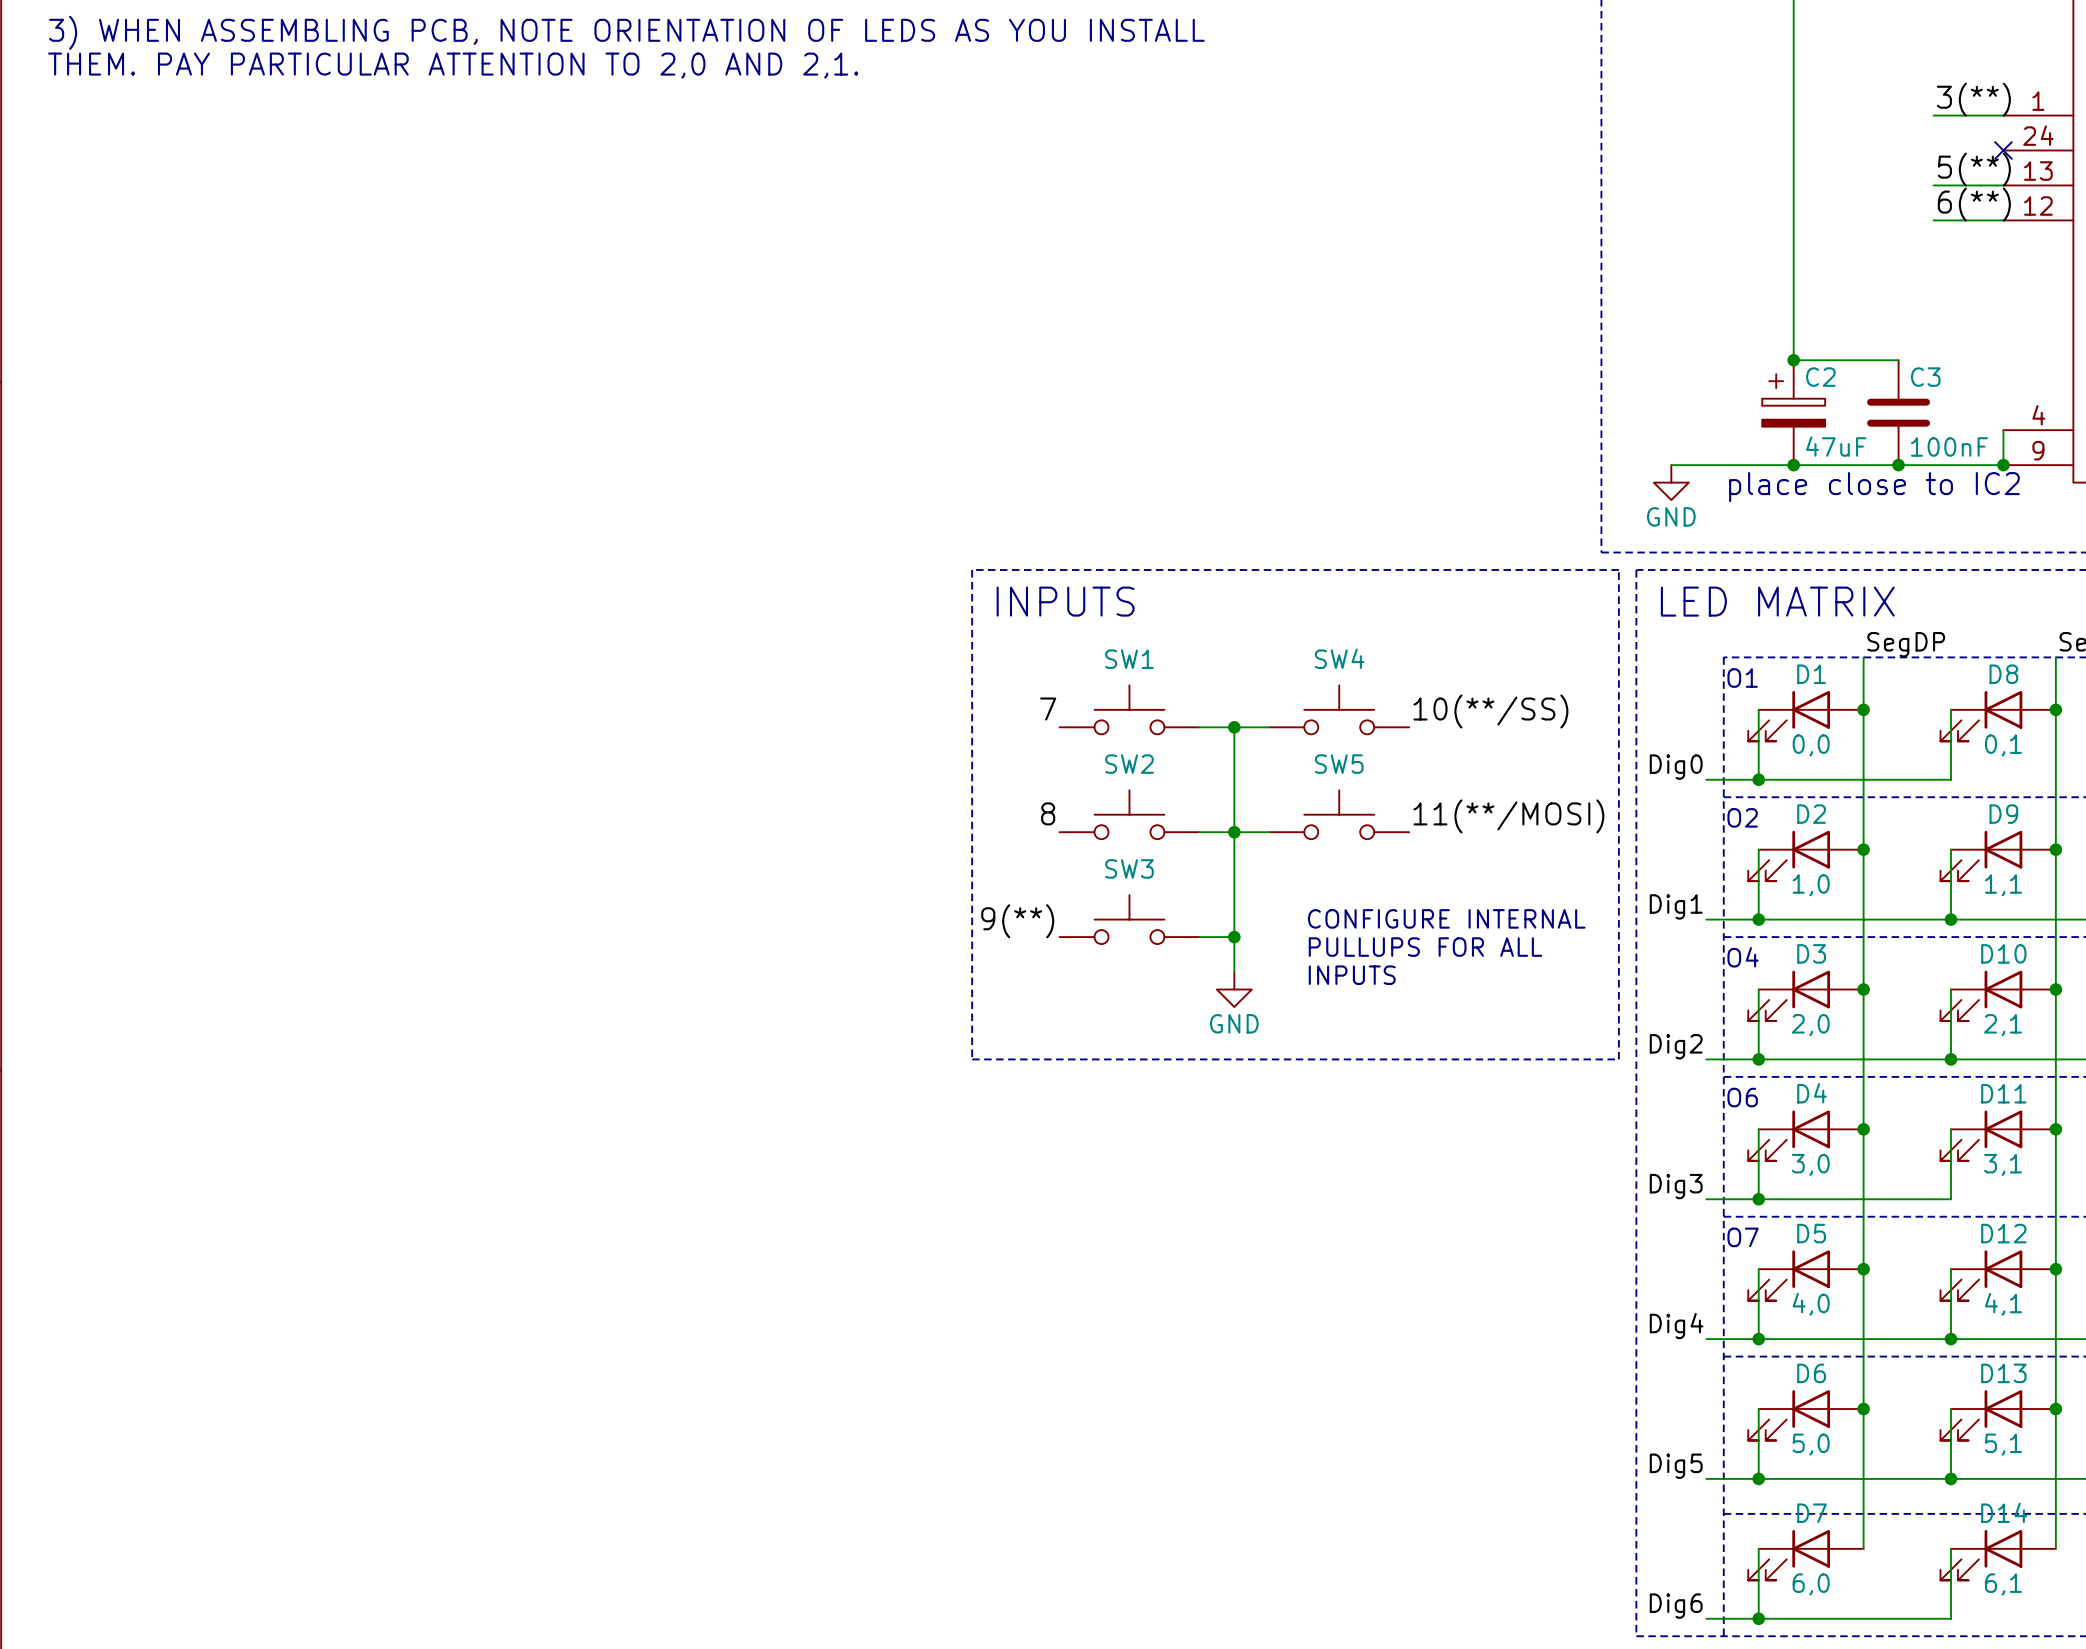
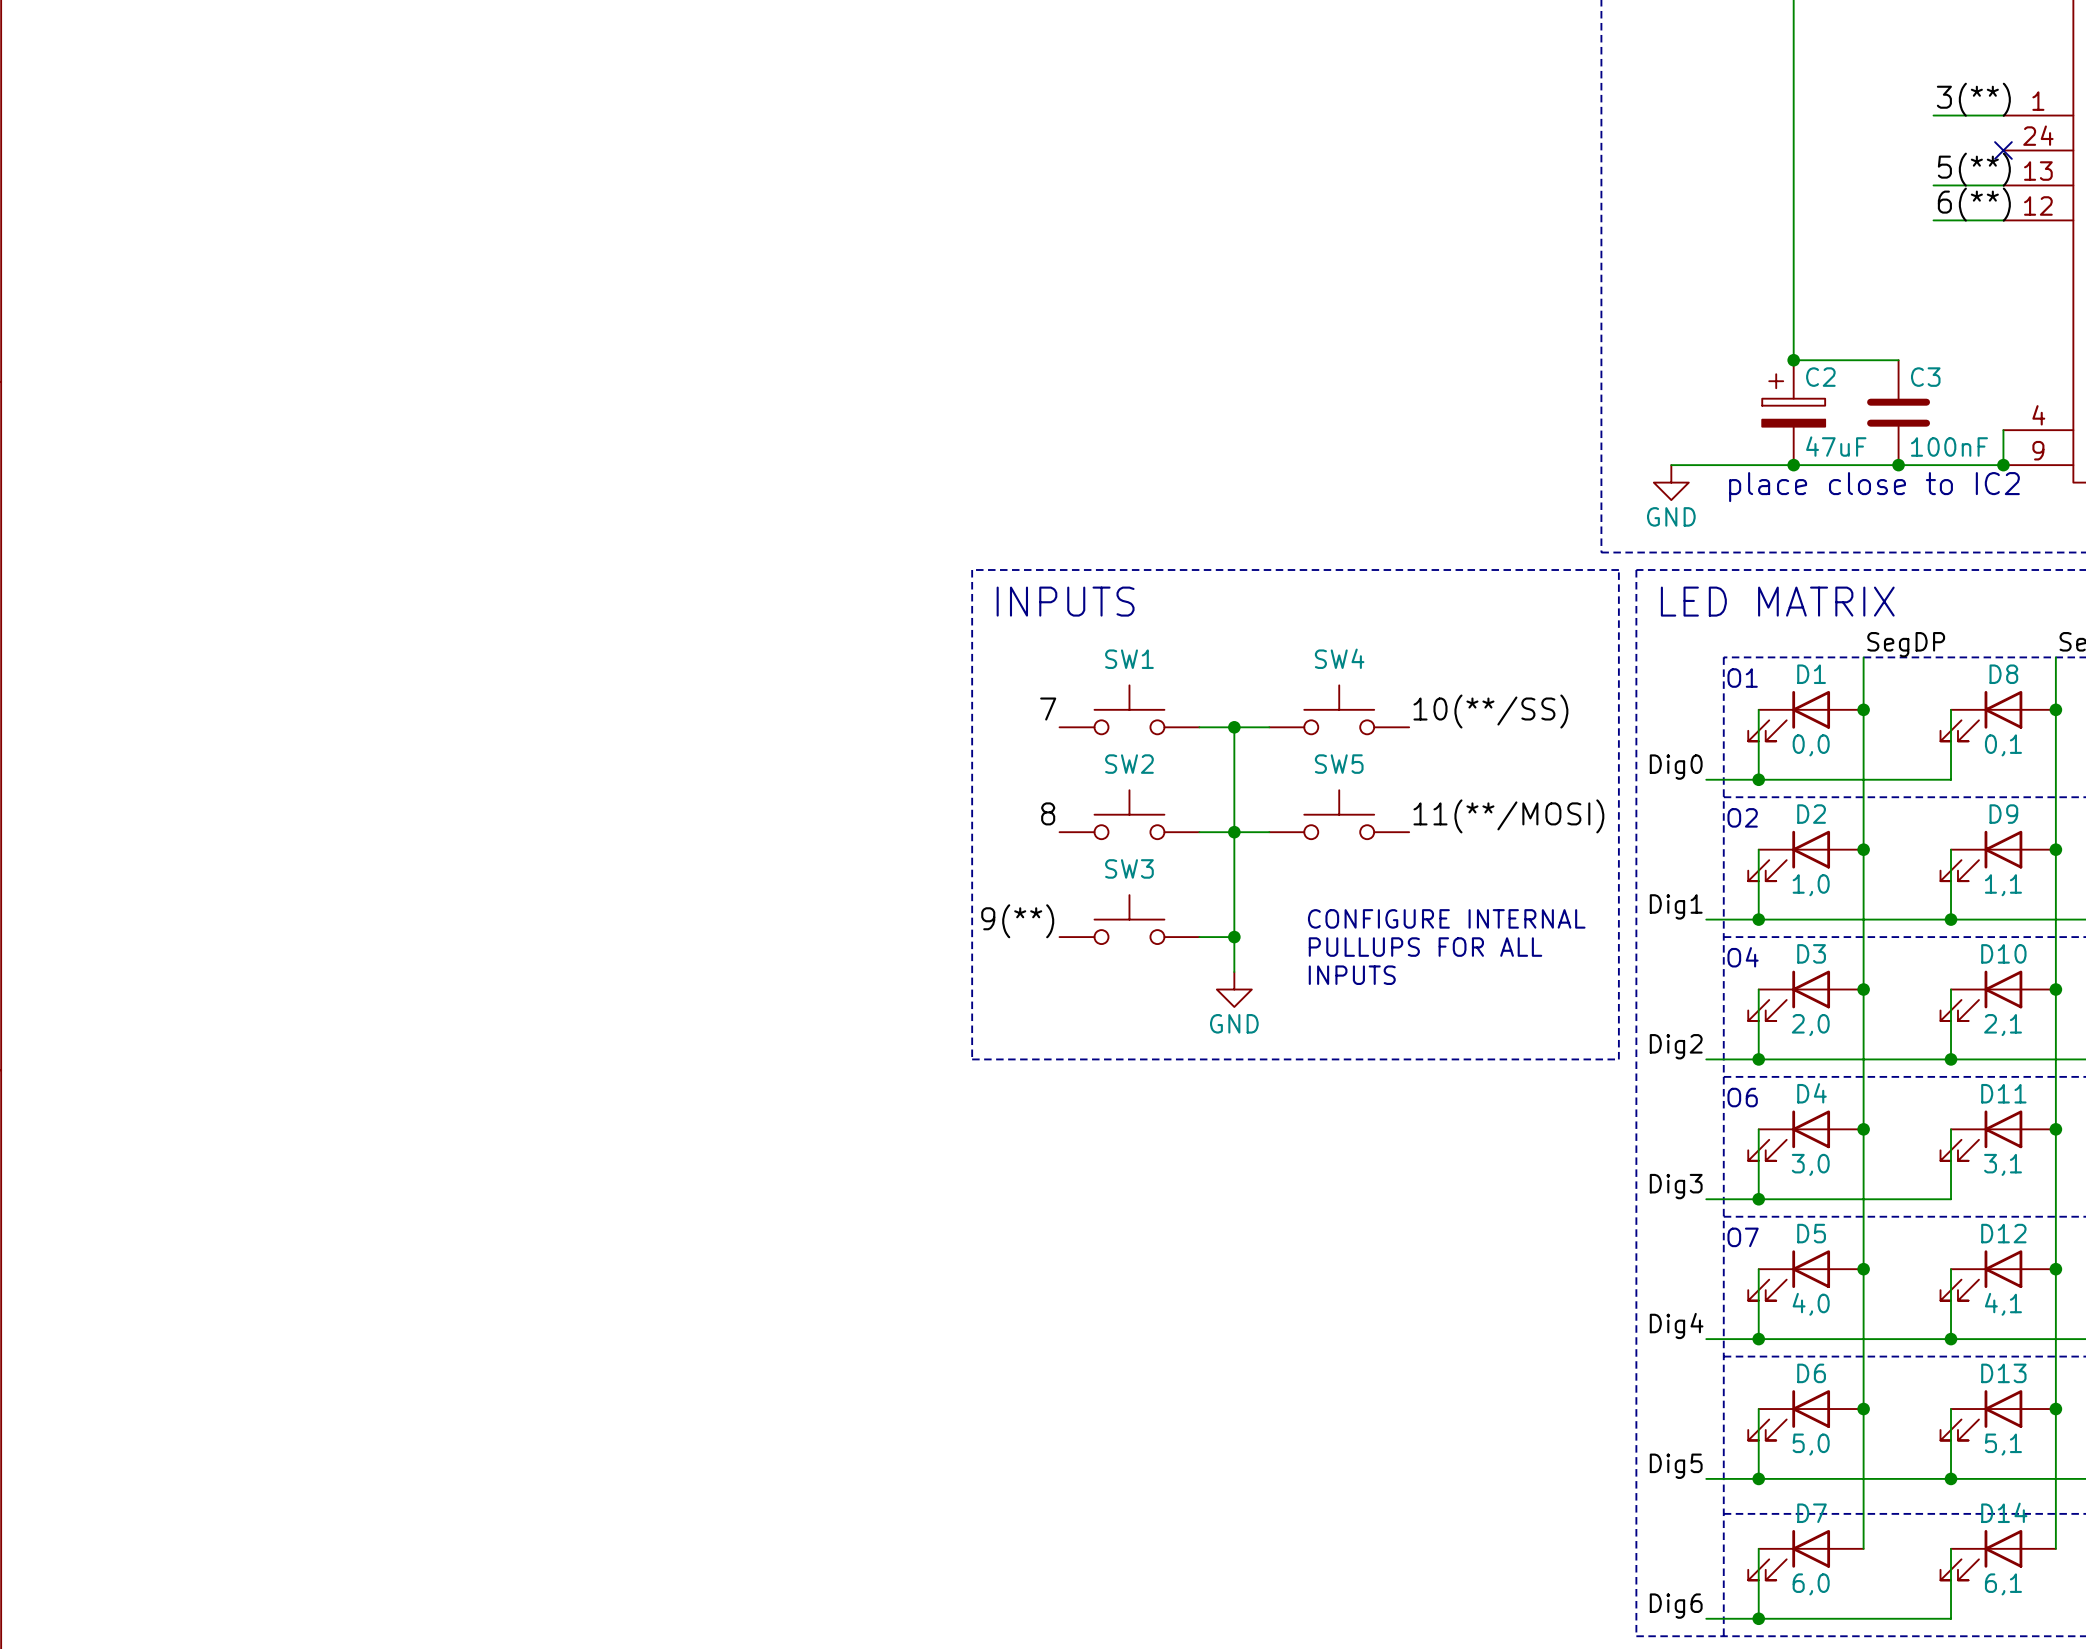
text: 3) WHEN ASSEMBLING PCB, NOTE ORIENTATION OF LEDS AS YOU INSTALL (626, 32) -> none
text: THEM. PAY PARTICULAR ATTENTION TO 2,0 AND 2,1. (453, 65) -> none

